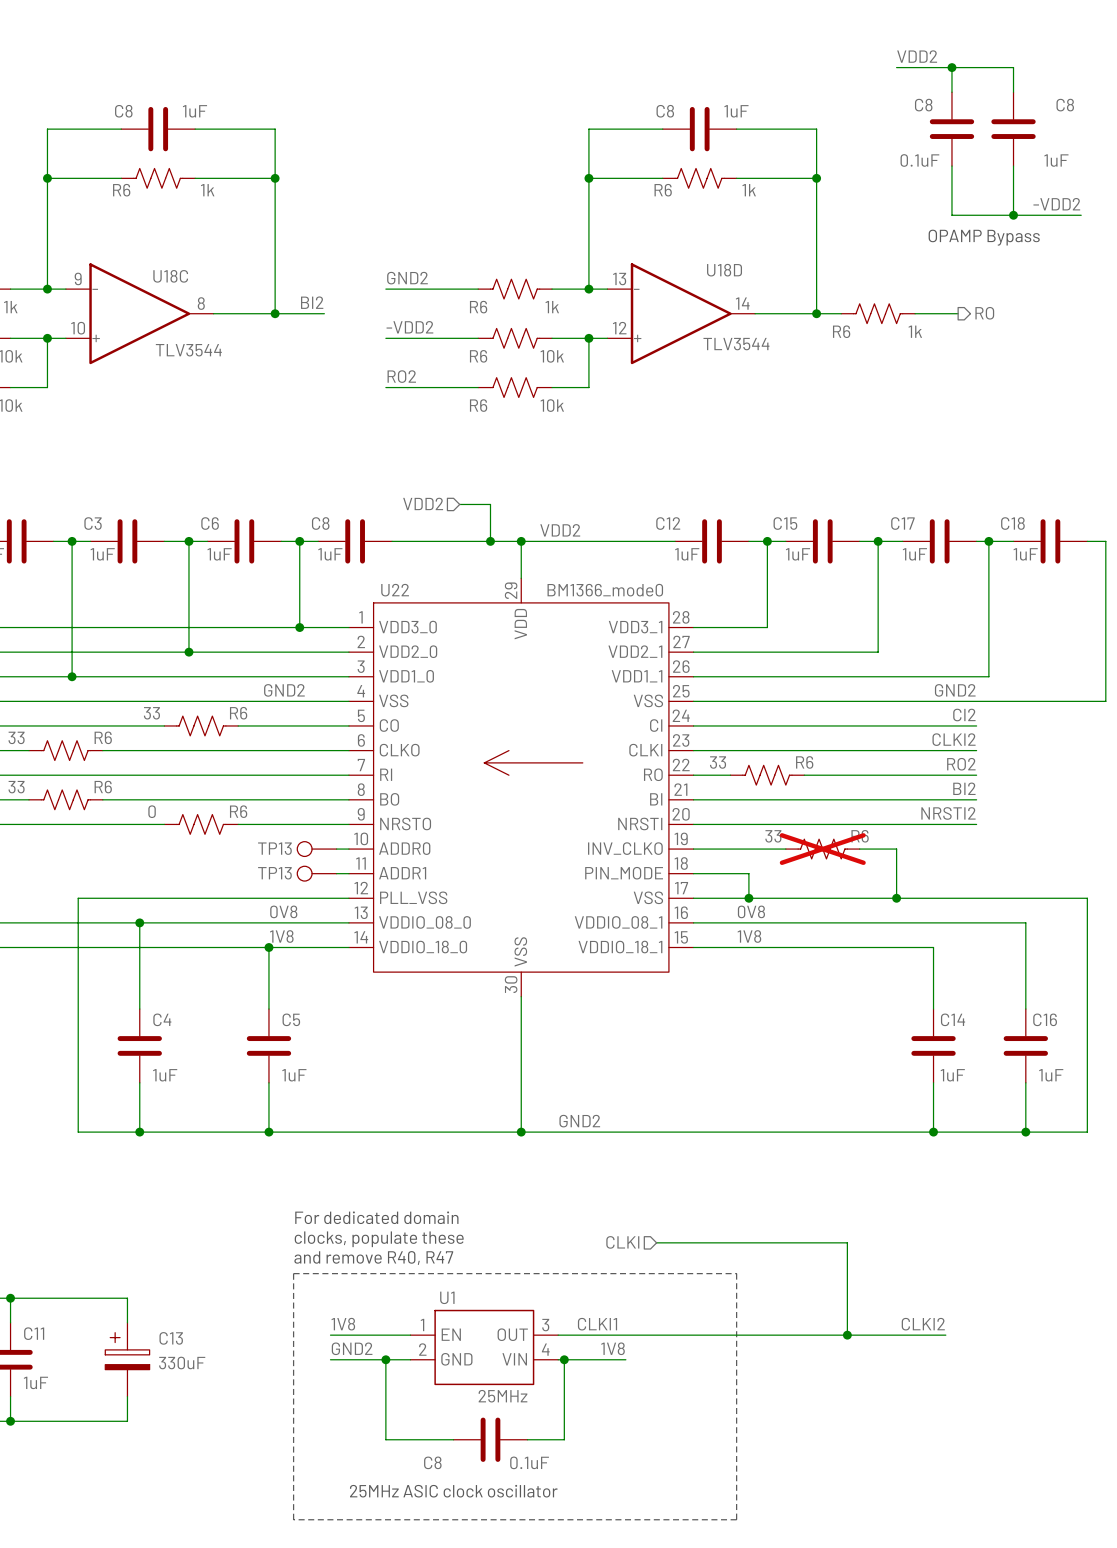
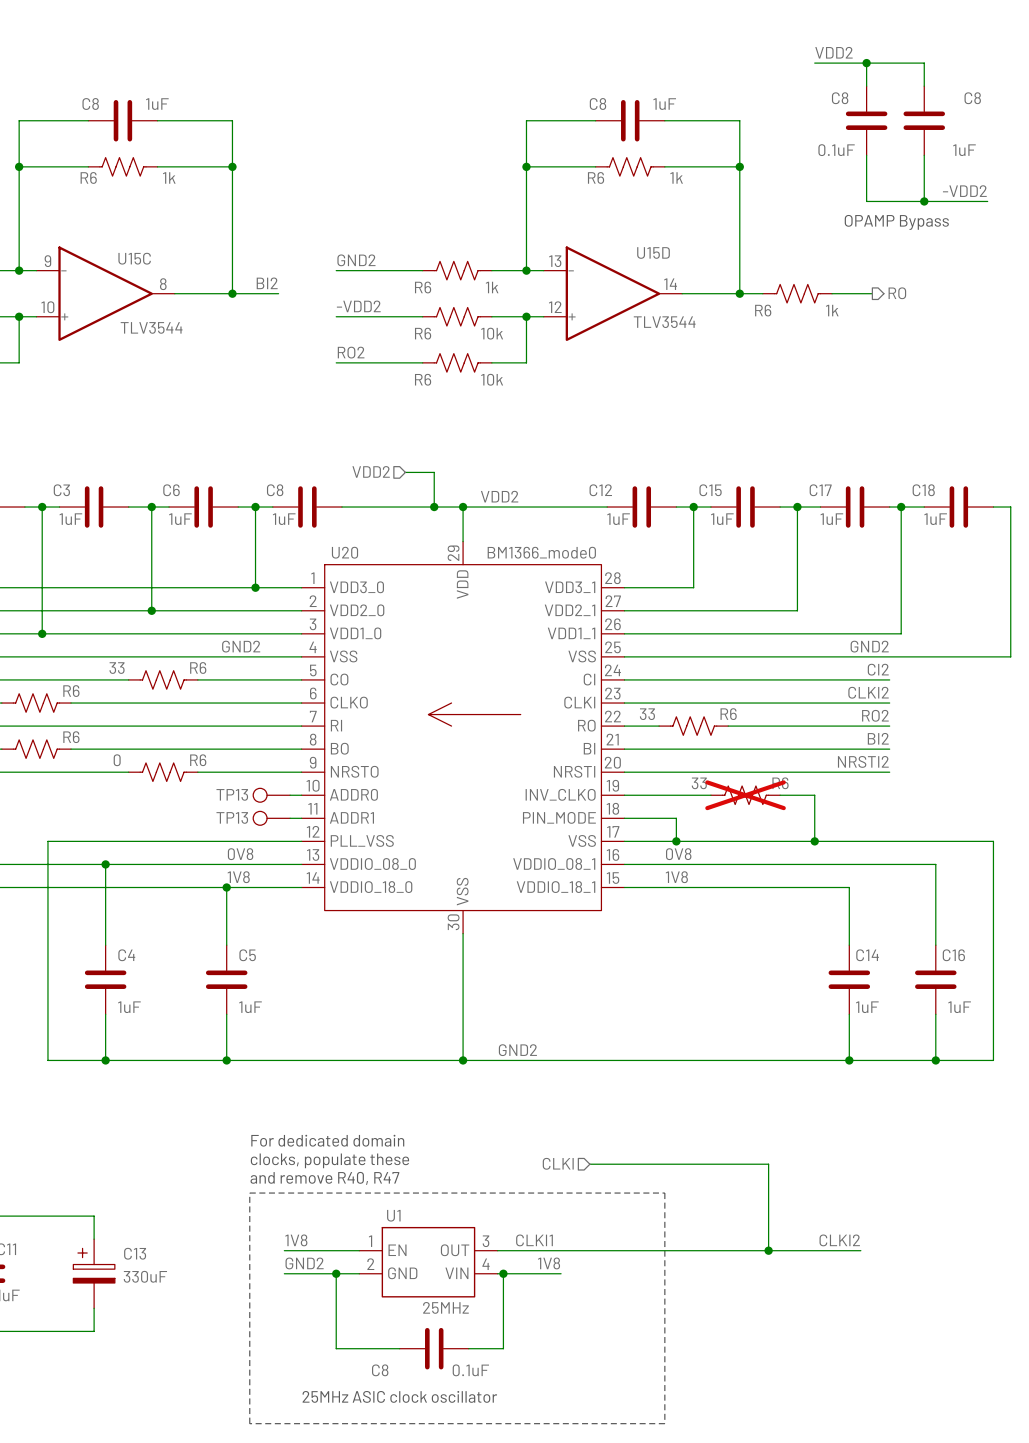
U18D name: U18D (724, 270) -> U15D (653, 252)
U18C name: U18C (170, 276) -> U15C (134, 258)
U22 name: U22 (395, 590) -> U20 (344, 552)

